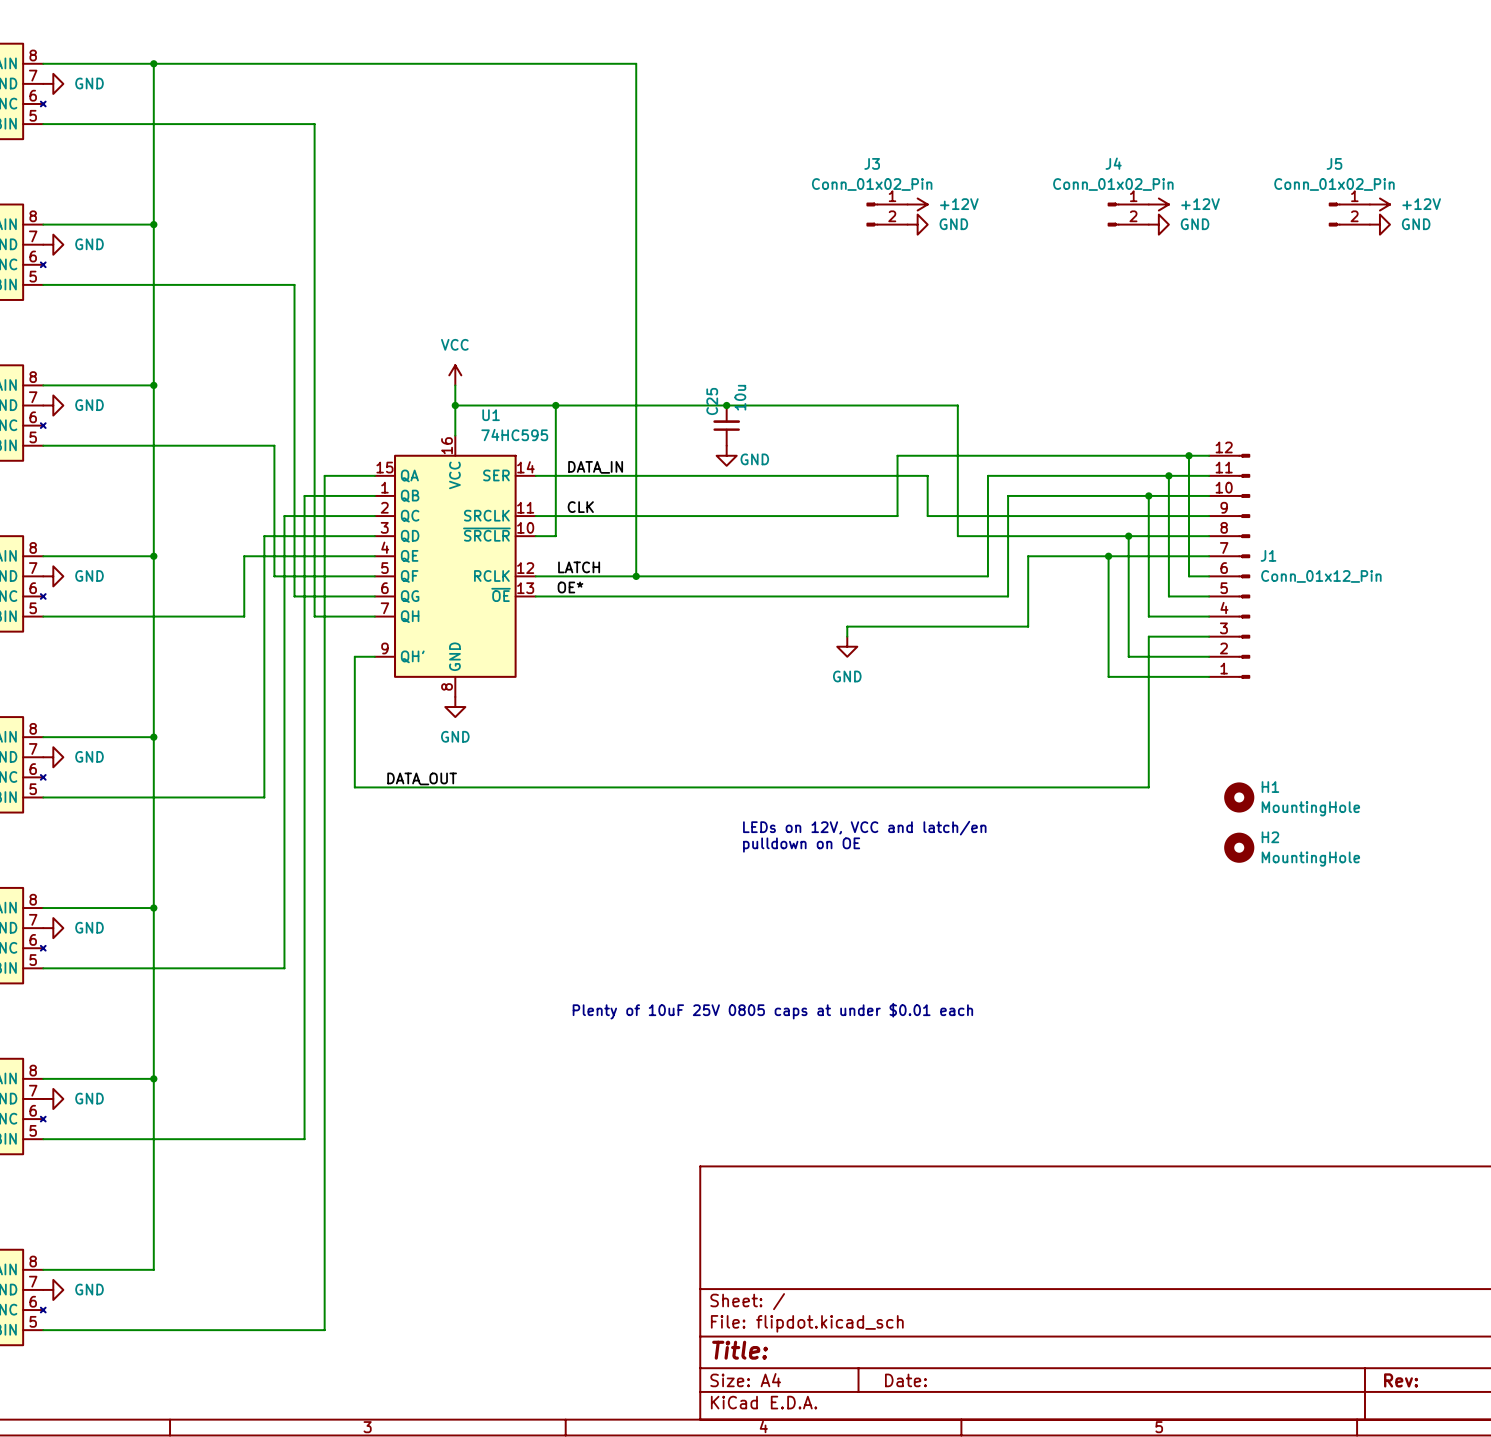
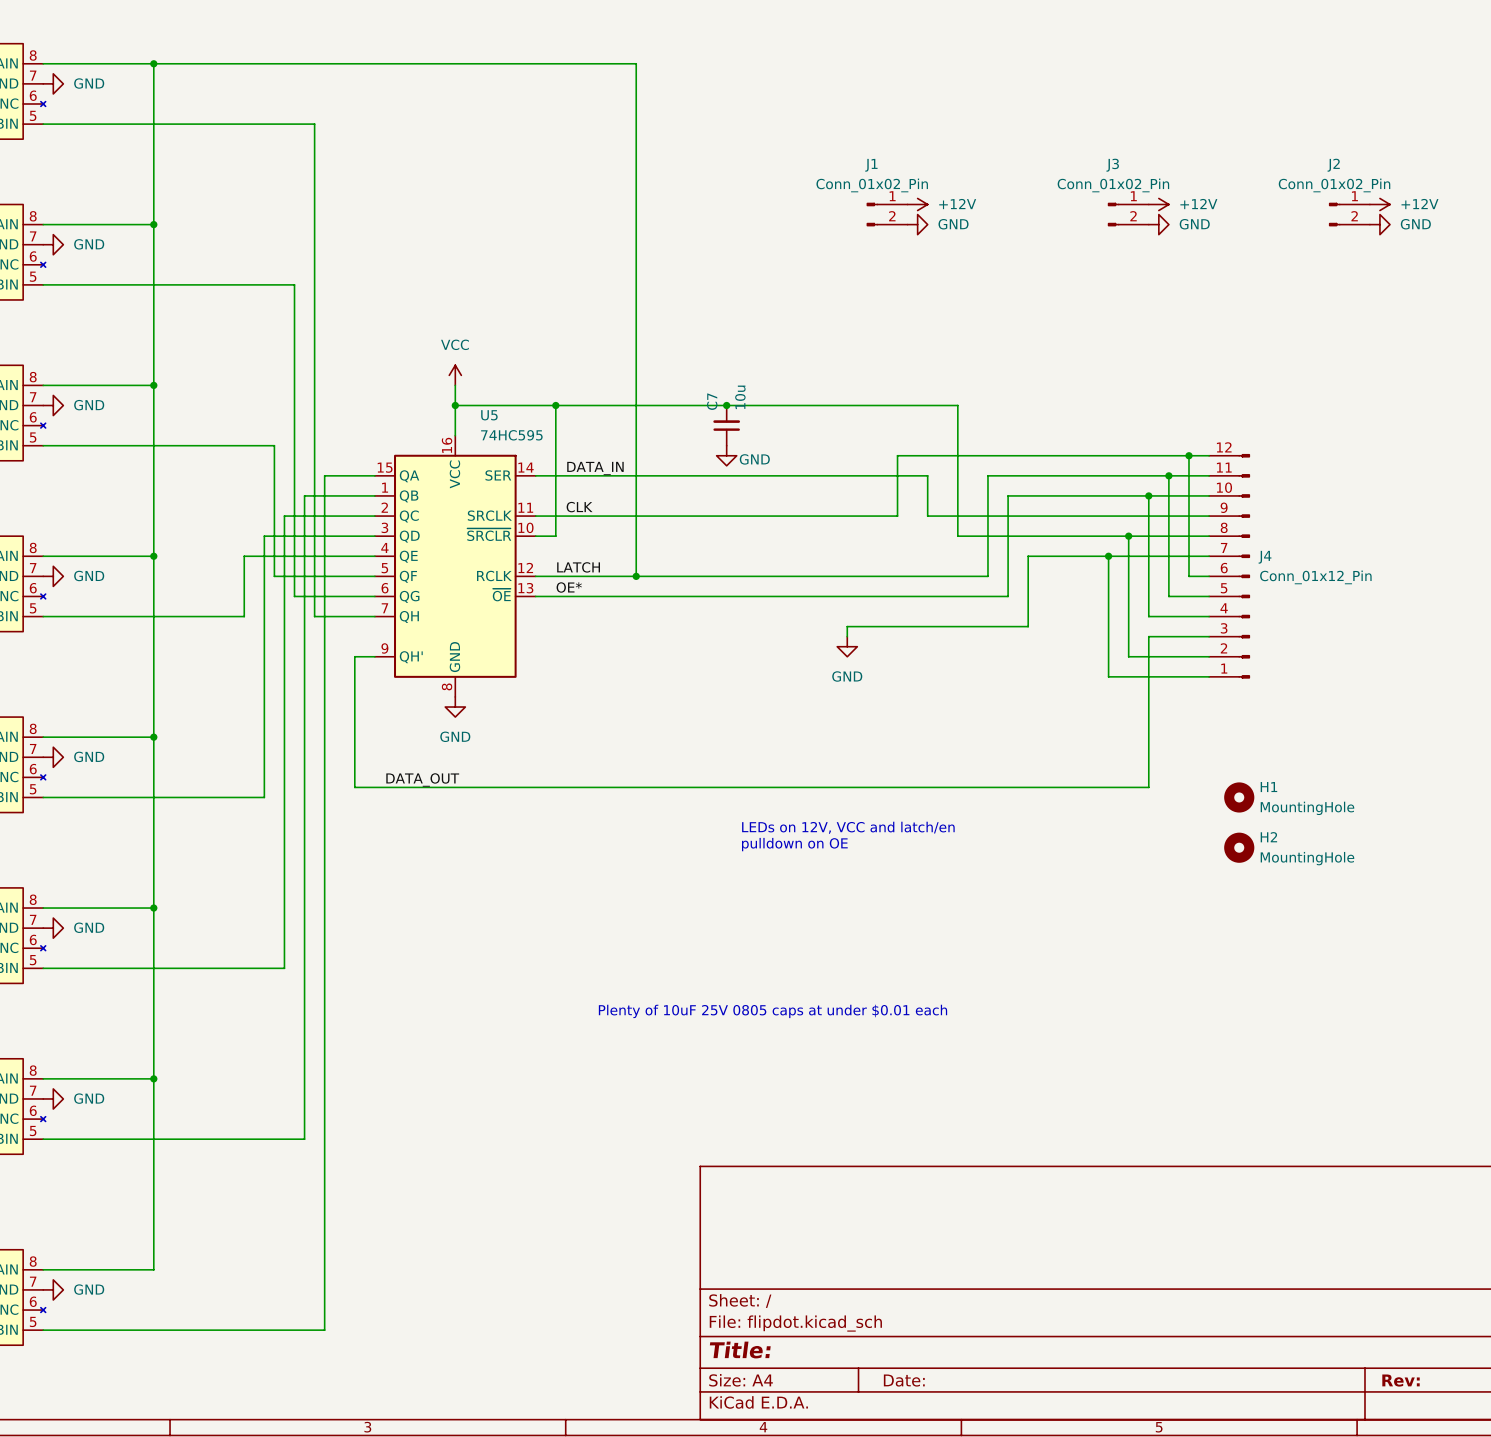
J3 name: J3 (872, 163) -> J1 (871, 165)
J4 name: J4 (1113, 163) -> J3 (1112, 165)
J5 name: J5 (1334, 163) -> J2 (1333, 165)
C25 name: C25 (712, 401) -> C7 (712, 401)
U1 name: U1 (491, 415) -> U5 (489, 415)
J1 name: J1 (1268, 555) -> J4 (1265, 557)

